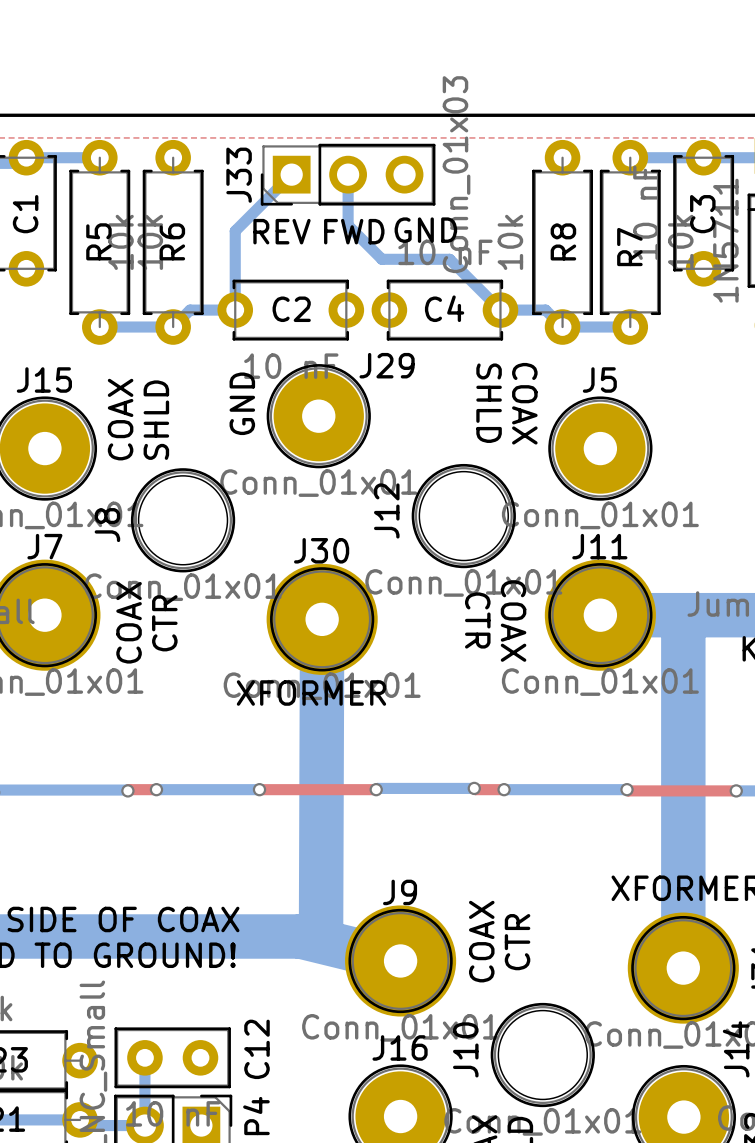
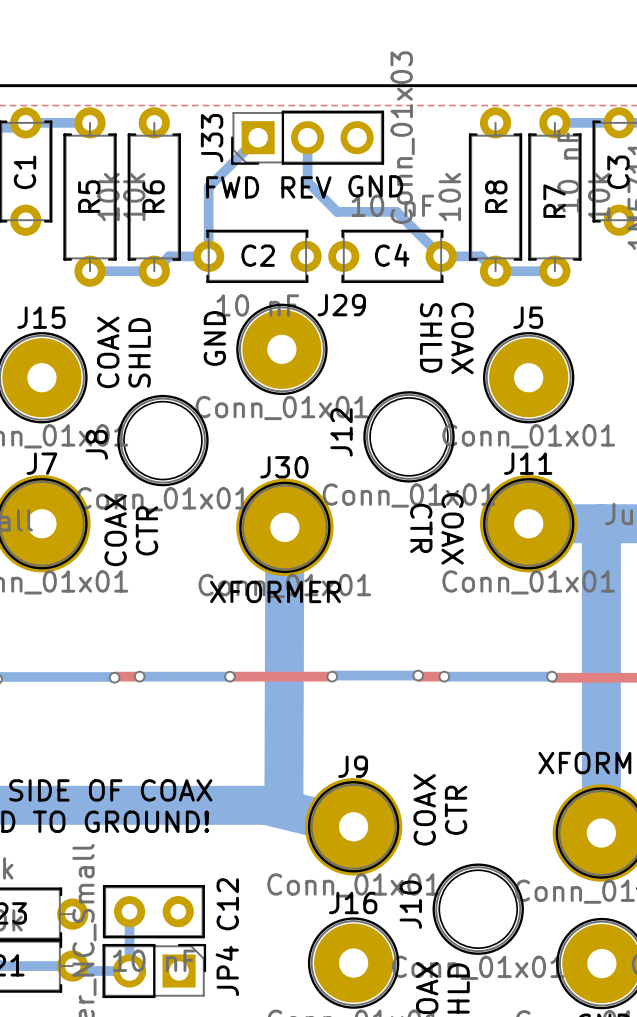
text: REV (281, 231) -> FWD (232, 187)
text: FWD (354, 231) -> REV (306, 187)

